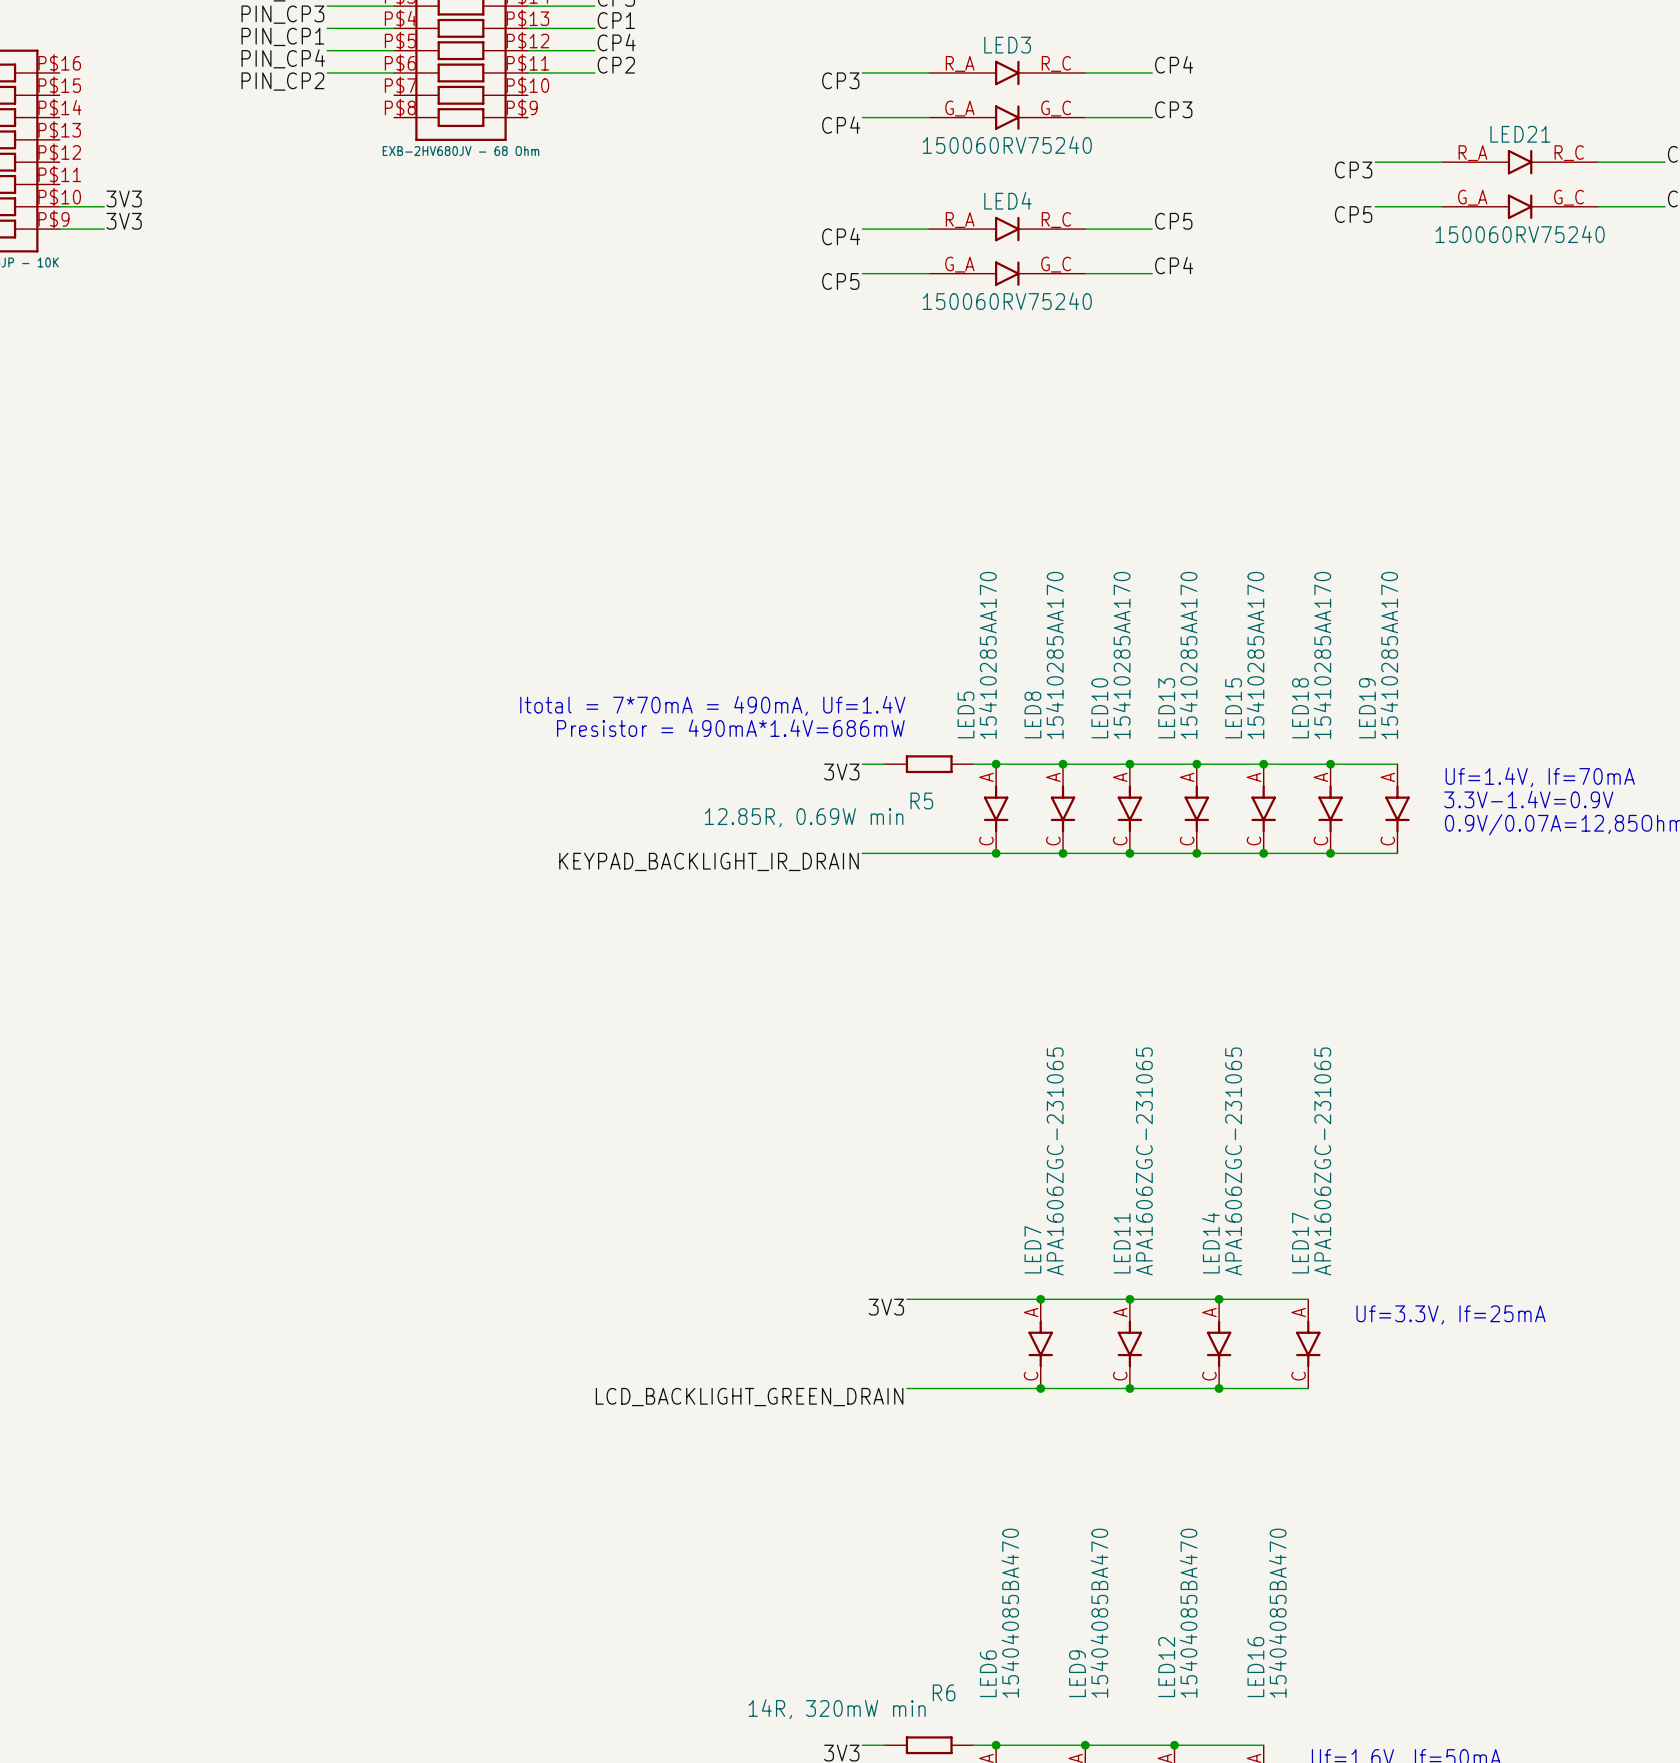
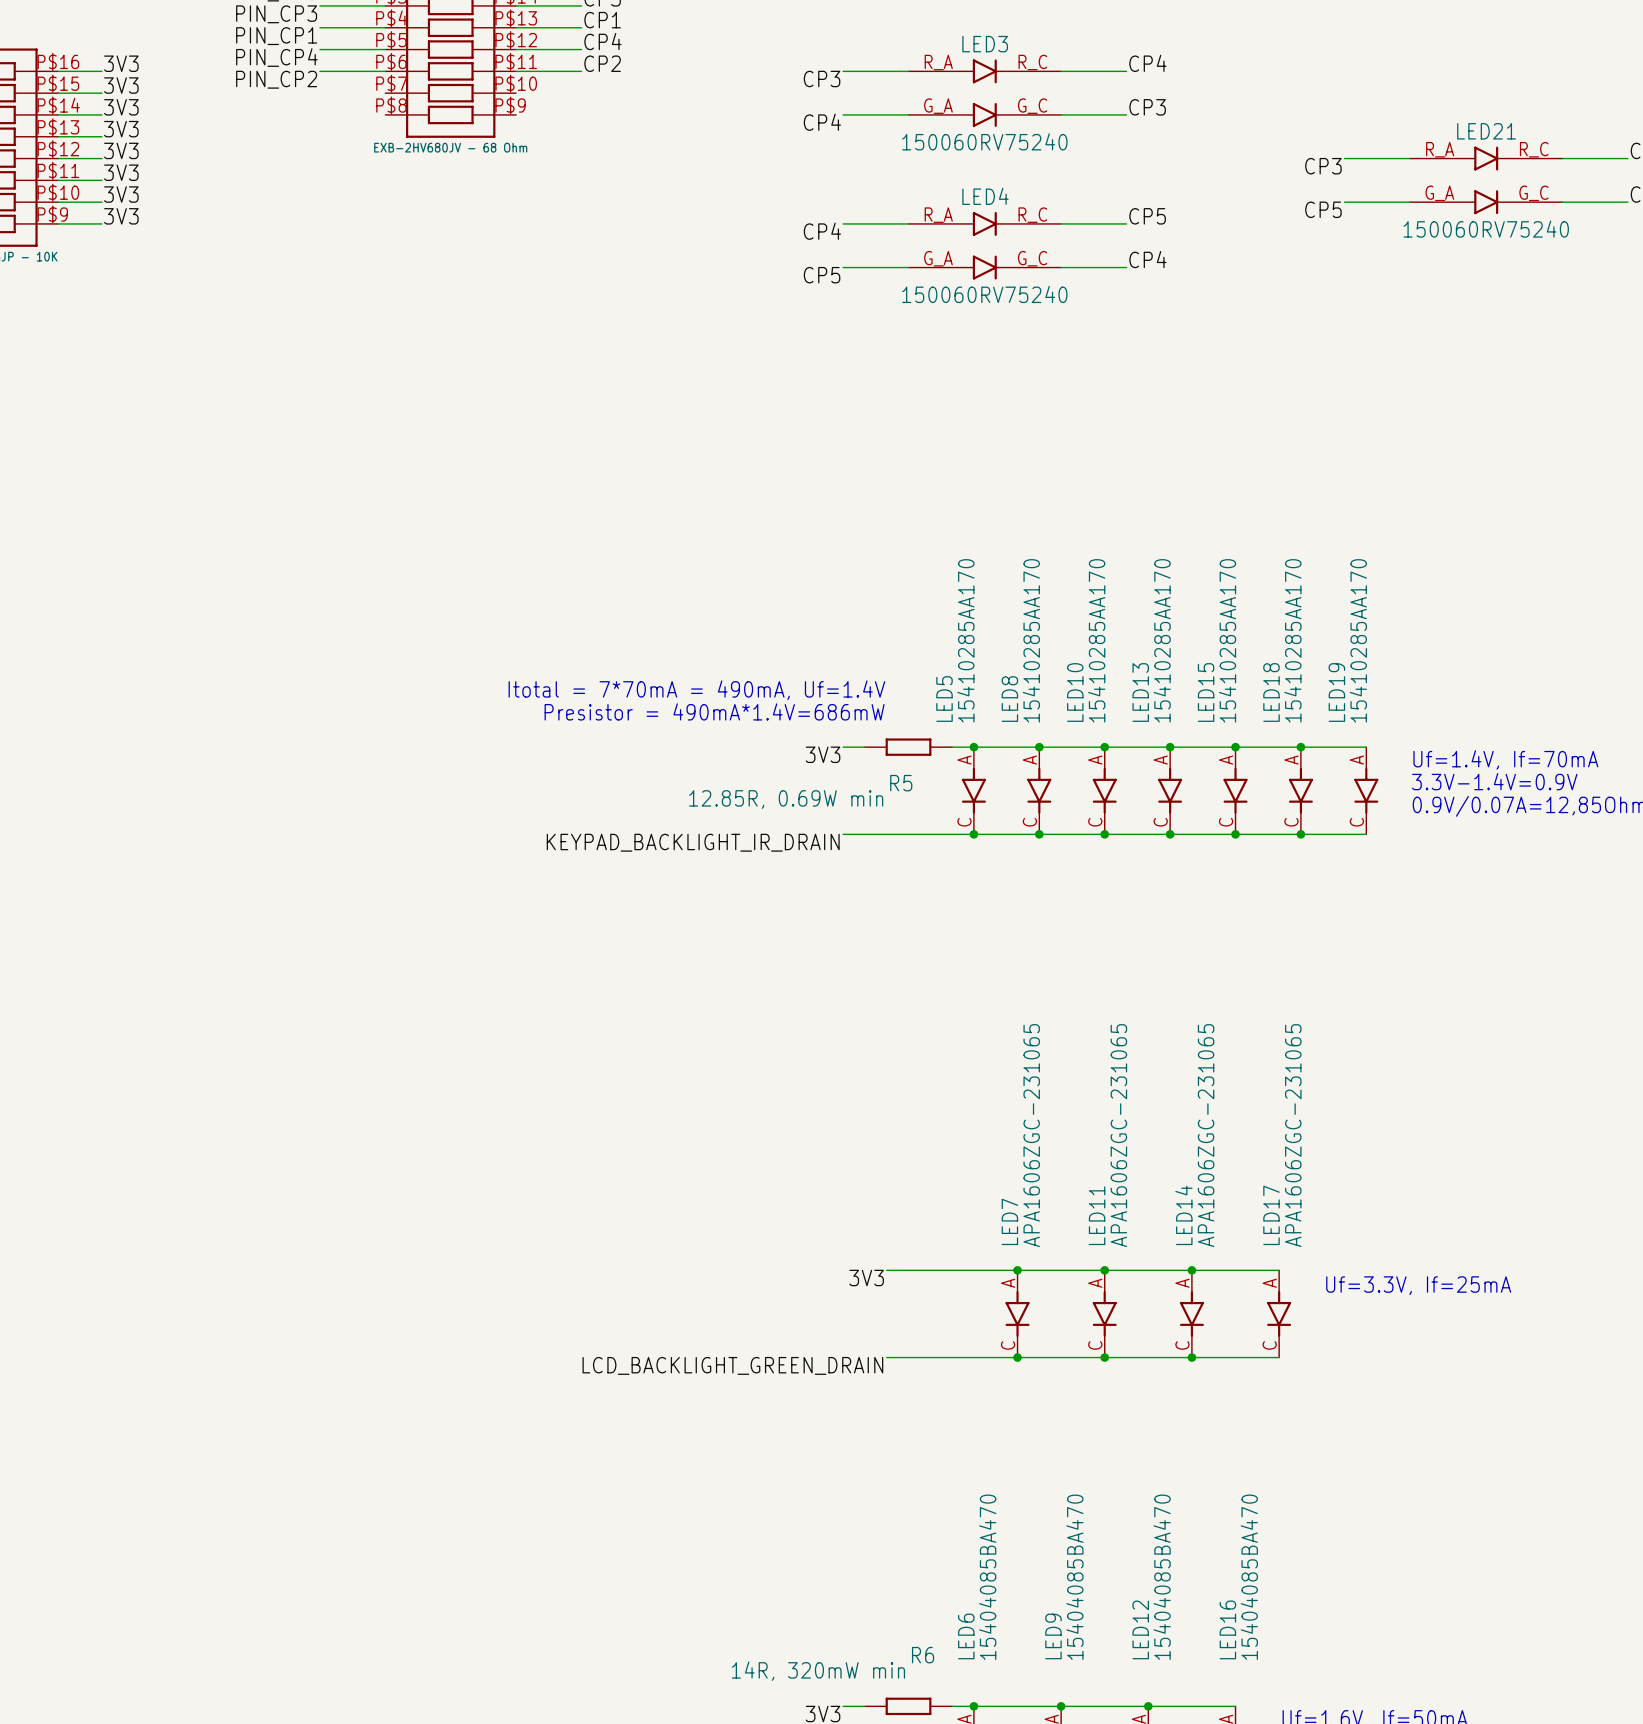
label: none -> 3V3 (121, 63)
wire: none -> (58, 71) (101, 71)
label: none -> 3V3 (121, 85)
wire: none -> (58, 93) (101, 93)
label: none -> 3V3 (121, 107)
wire: none -> (58, 114) (101, 114)
label: none -> 3V3 (121, 129)
wire: none -> (58, 136) (101, 136)
label: none -> 3V3 (121, 150)
wire: none -> (58, 158) (101, 158)
label: none -> 3V3 (121, 172)
wire: none -> (58, 180) (101, 180)

